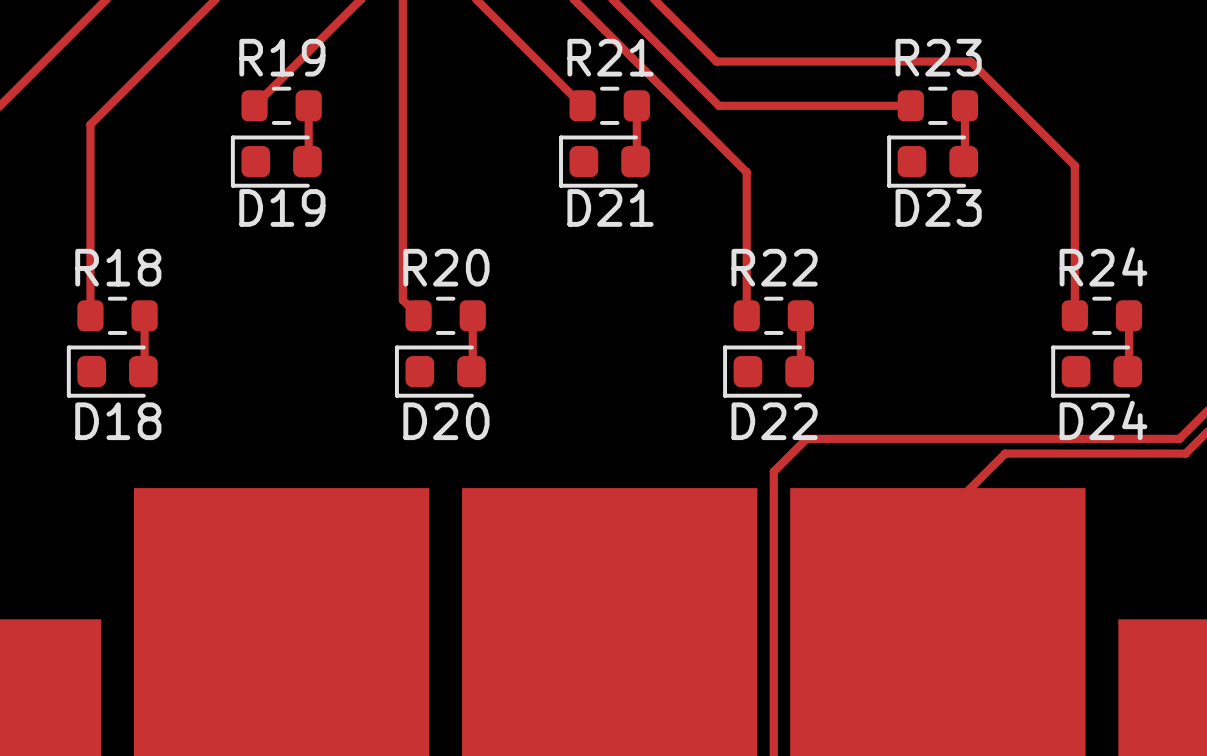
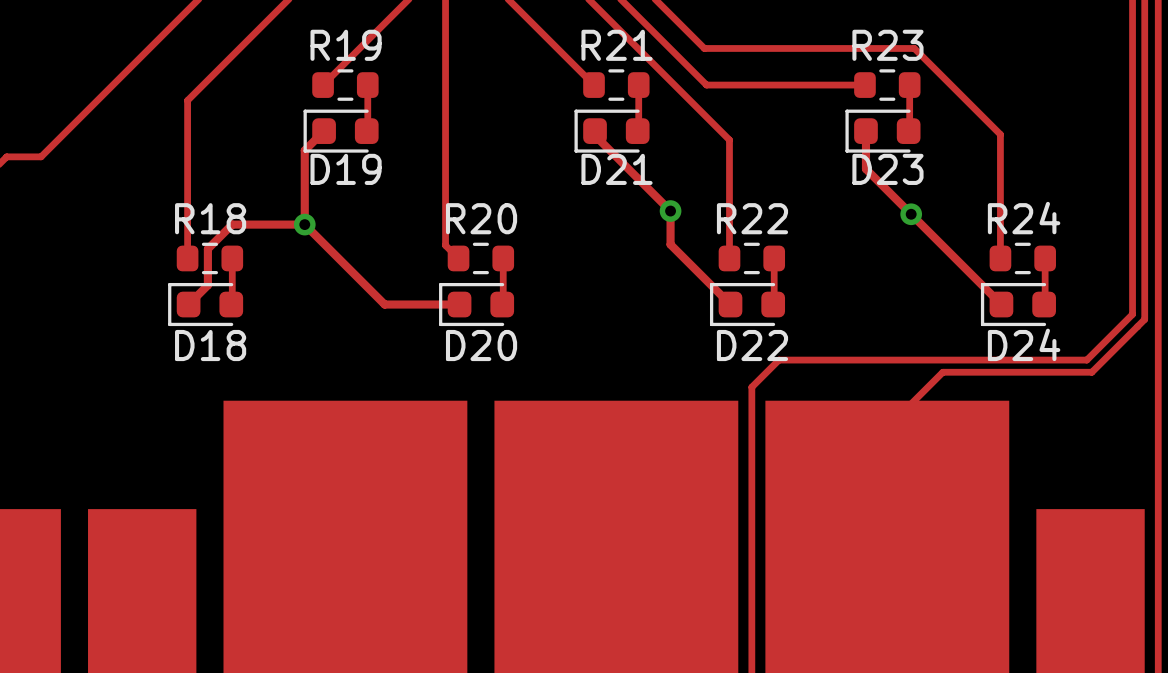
track: none -> (324, 131) (304, 150) (304, 224)
track: none -> (595, 131) (595, 135) (670, 211) (670, 244) (730, 304)
track: none -> (865, 131) (865, 169) (1001, 304)
via: none -> (670, 211)
via: none -> (911, 214)
track: none -> (304, 224) (232, 224) (207, 248) (207, 285) (188, 304)
track: none -> (304, 224) (384, 304) (459, 304)
via: none -> (304, 224)

